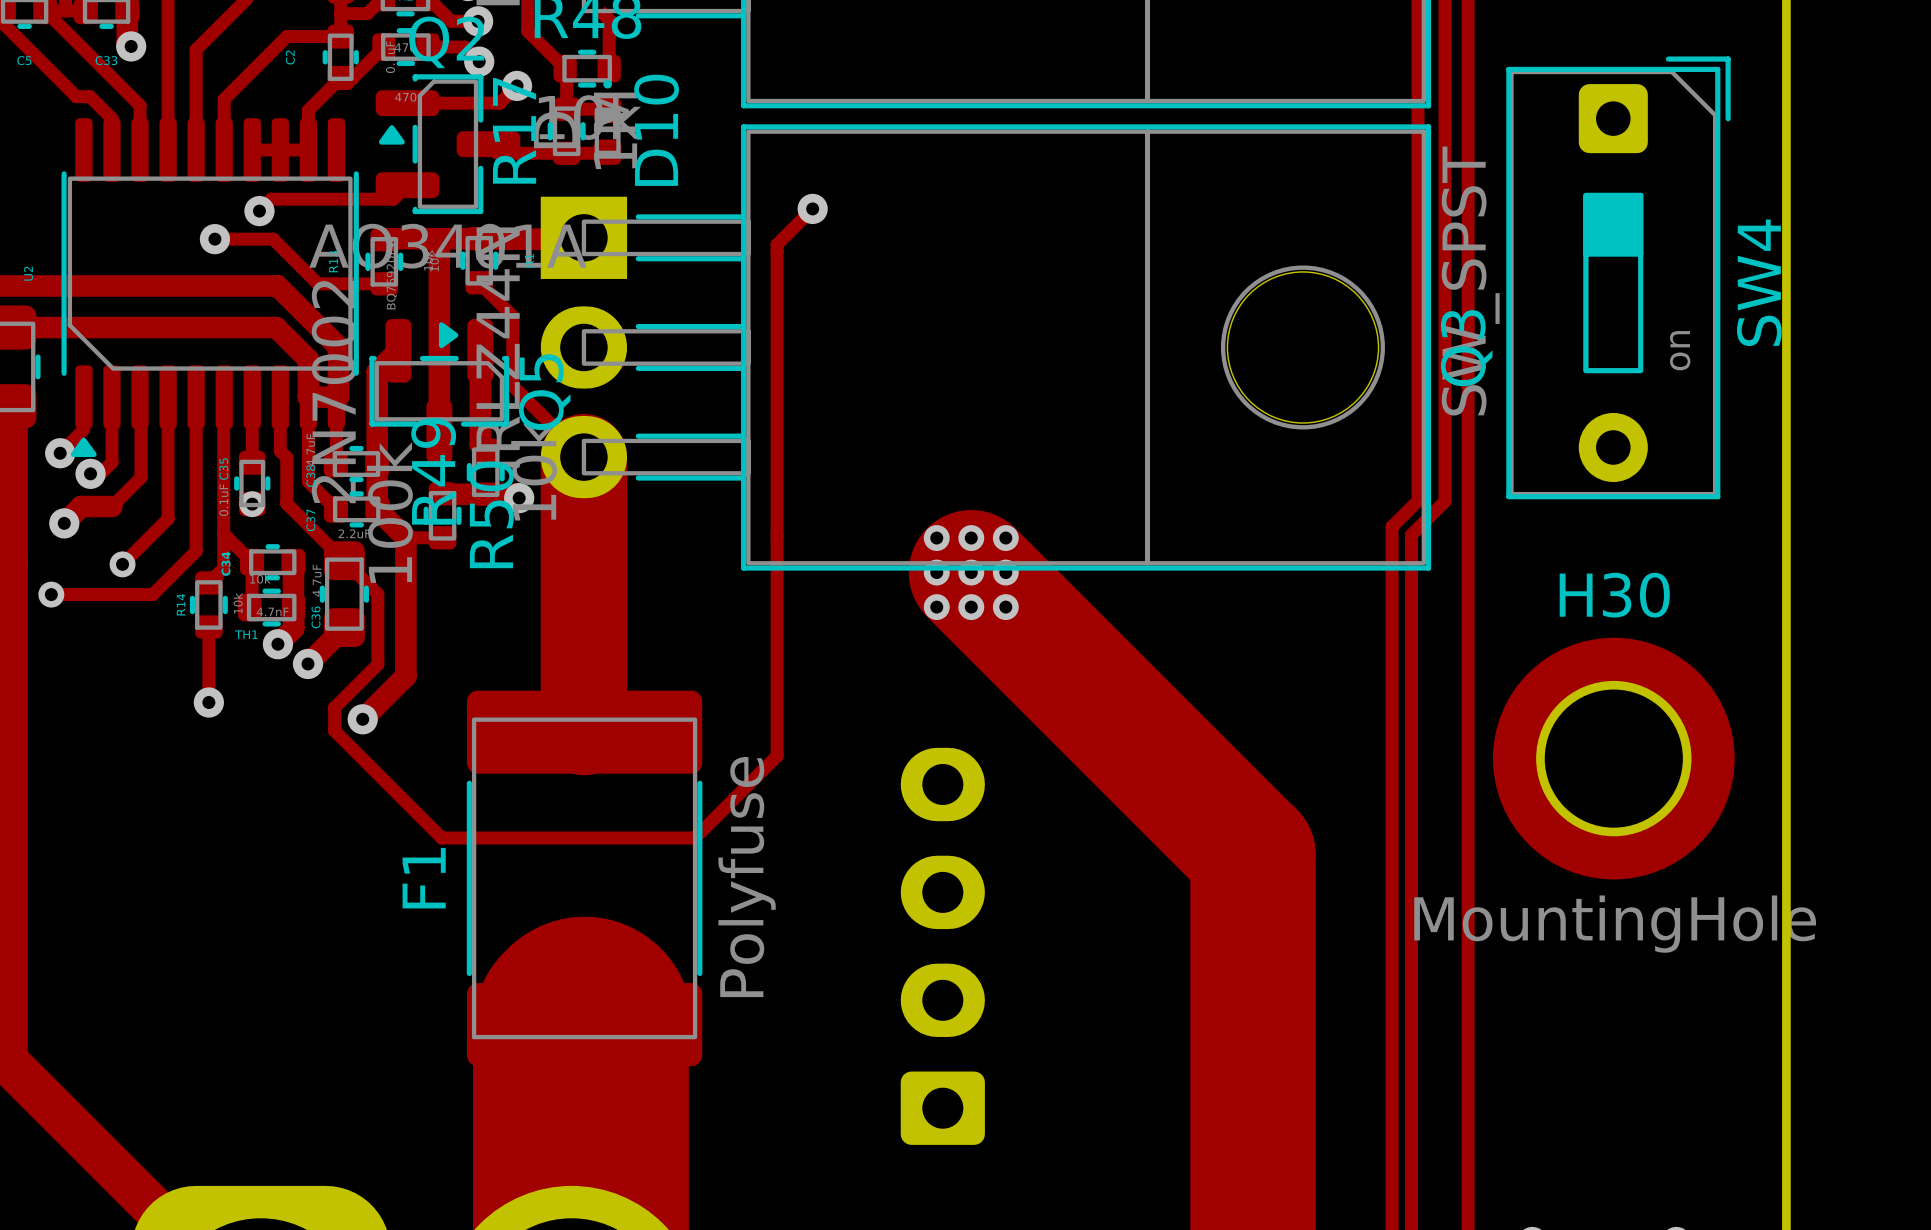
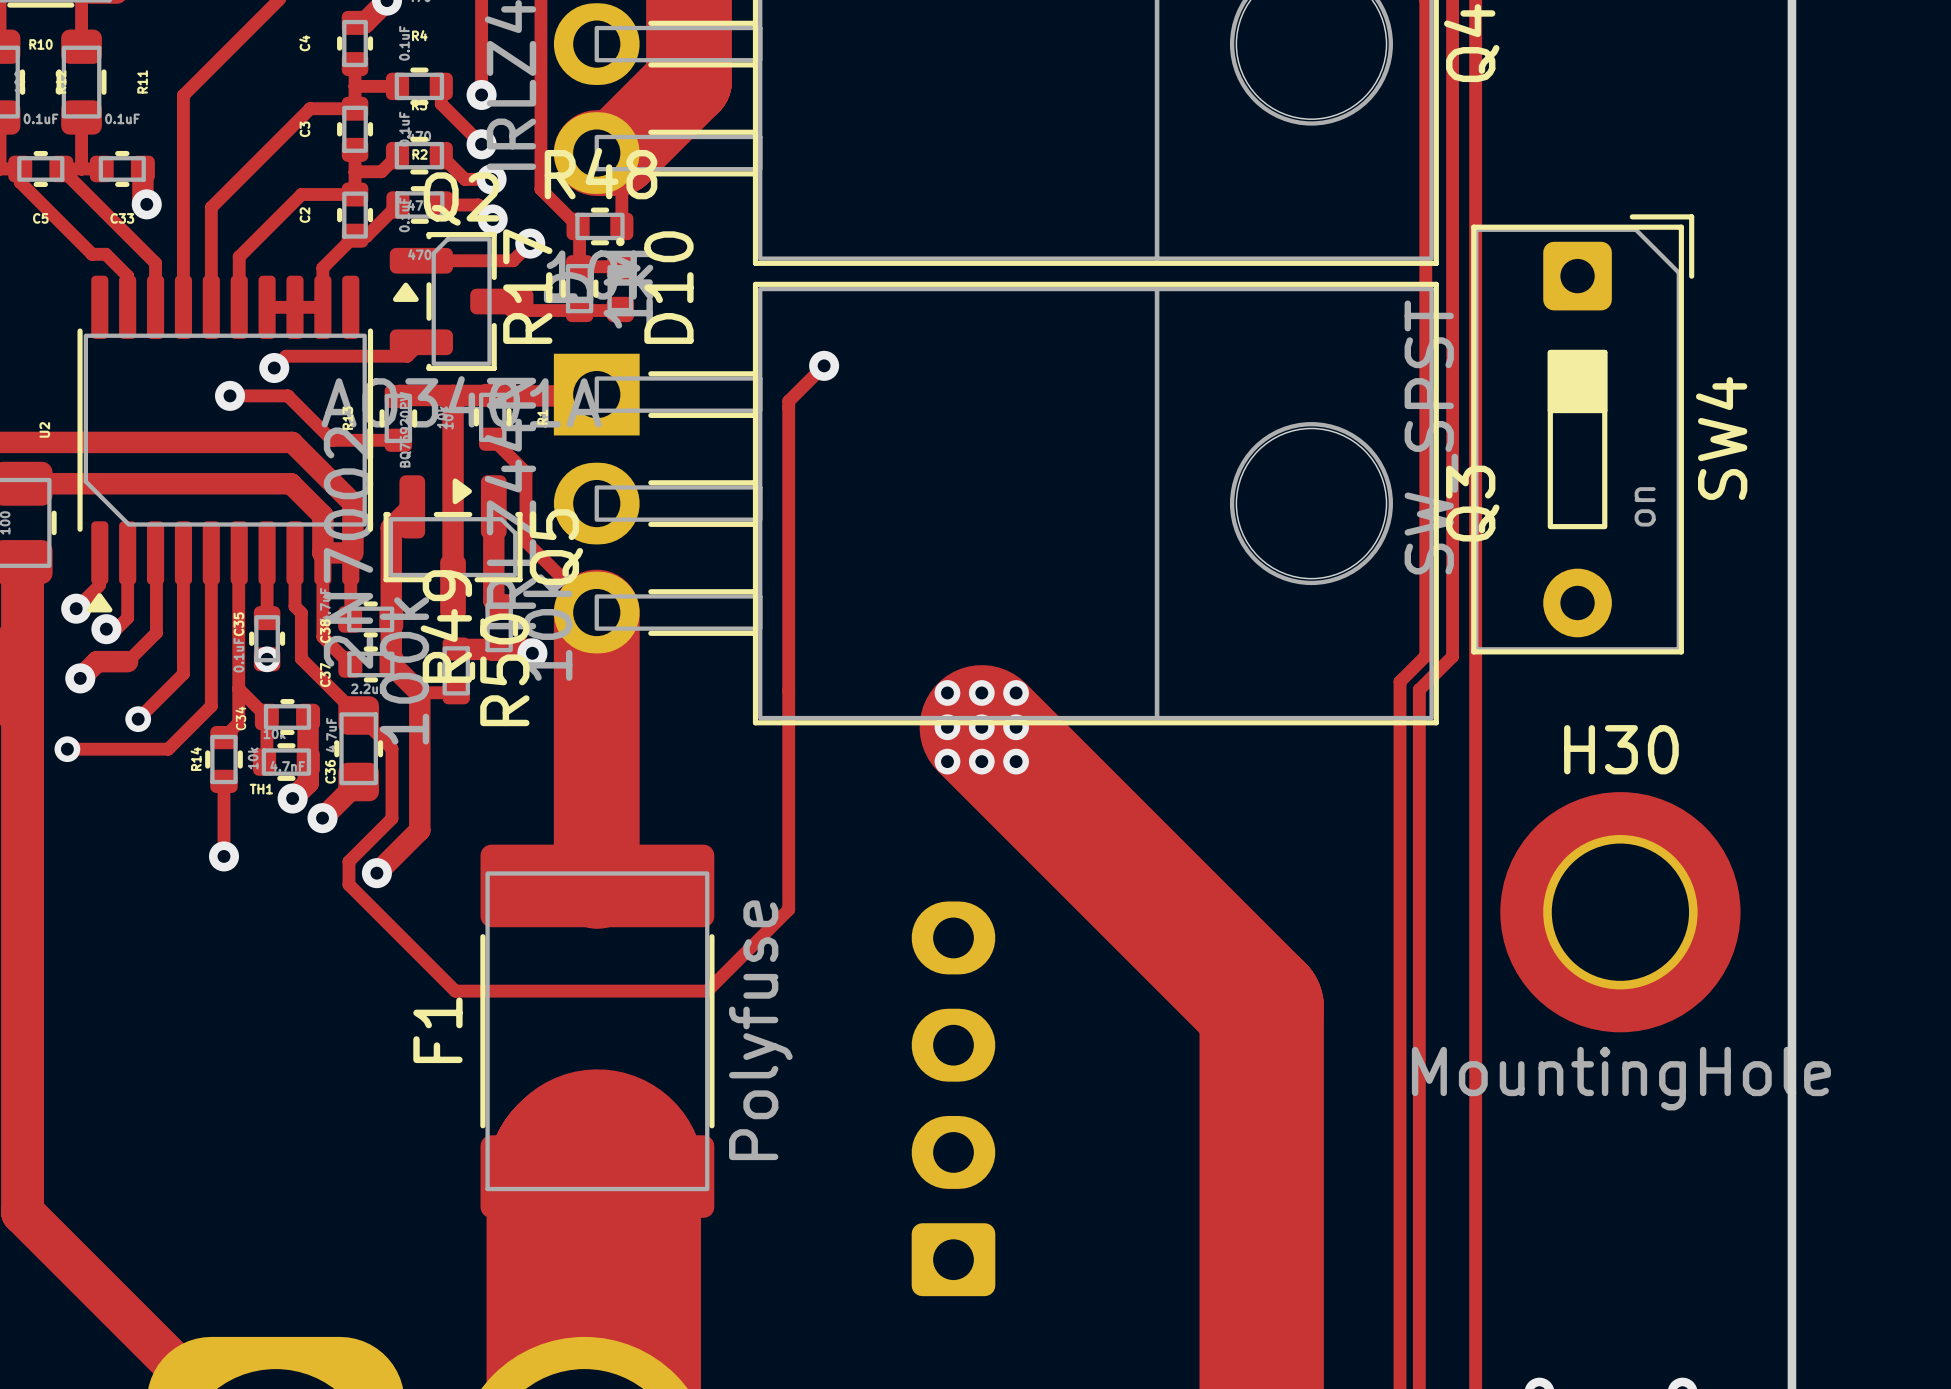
SW4 position: (1618, 277) -> (1582, 434)

